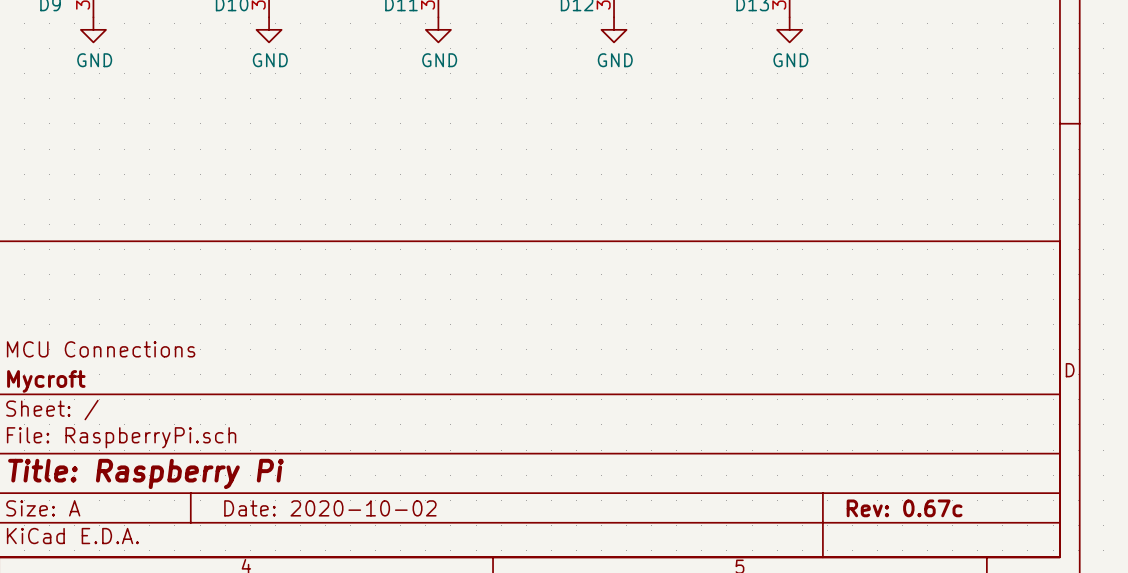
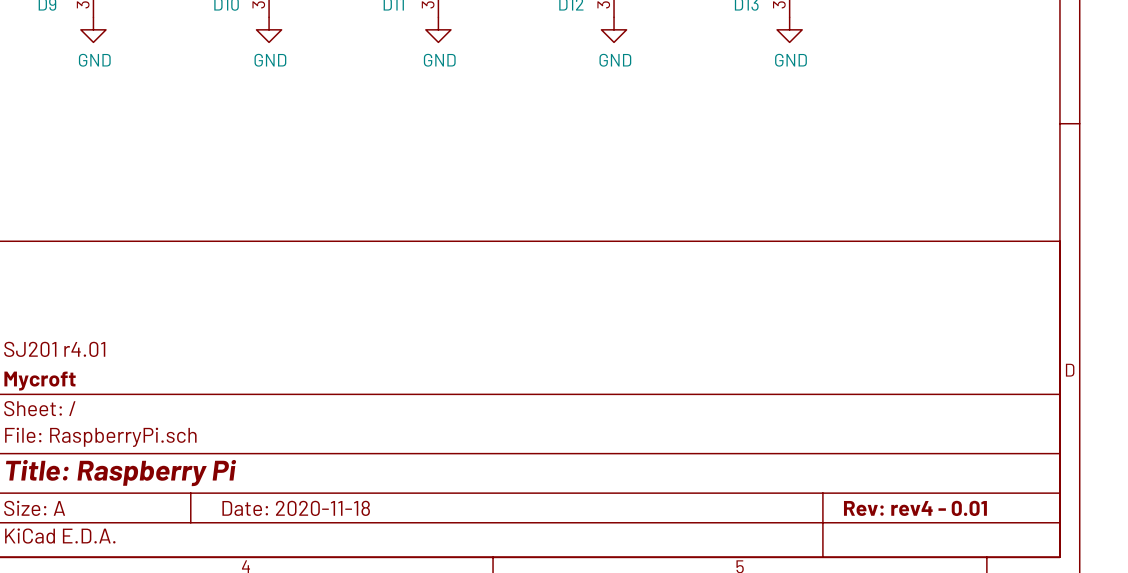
title block: MCU Connections (101, 349) -> SJ201 r4.01 (54, 349)
title block: Date: 2020-10-02 (330, 508) -> Date: 2020-11-18 (296, 508)
title block: Rev: 0.67c (904, 508) -> Rev: rev4 - 0.01 (915, 508)

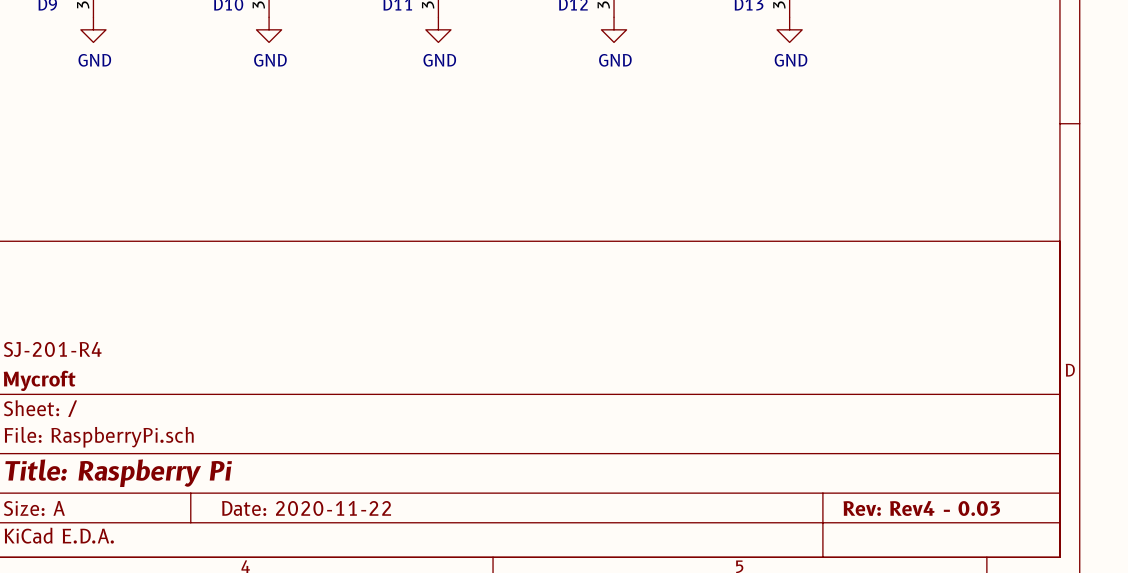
title block: SJ201 r4.01 (54, 349) -> SJ-201-R4 (52, 349)
title block: Date: 2020-11-18 (296, 508) -> Date: 2020-11-22 (306, 508)
title block: Rev: rev4 - 0.01 (915, 508) -> Rev: Rev4 - 0.03 (921, 508)

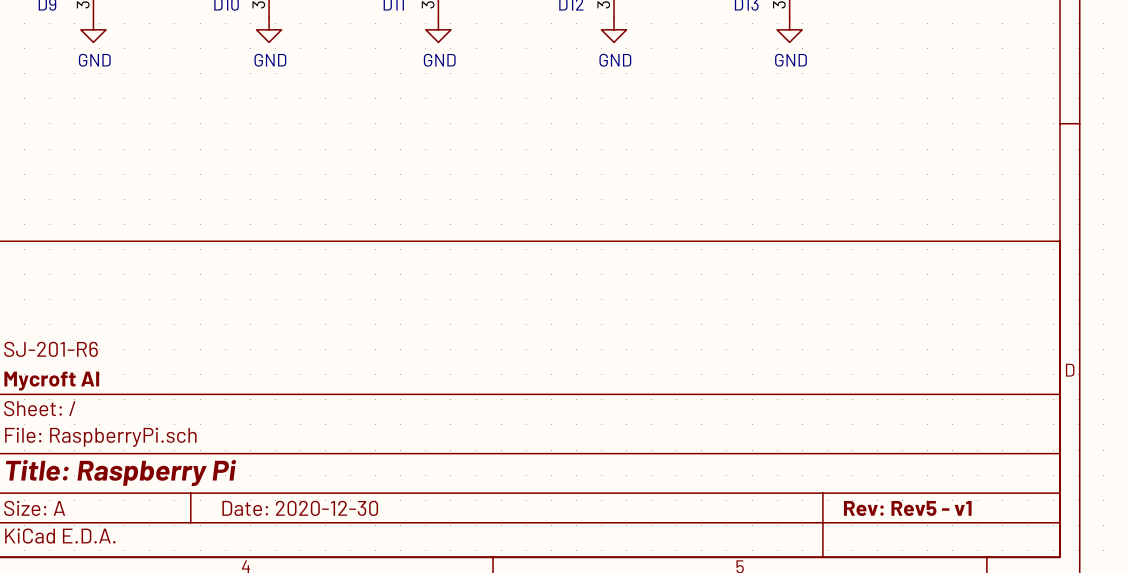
title block: SJ-201-R4 (52, 349) -> SJ-201-R6 (51, 349)
title block: Mycroft (39, 380) -> Mycroft AI (51, 381)
title block: Date: 2020-11-22 (306, 508) -> Date: 2020-12-30 (300, 508)
title block: Rev: Rev4 - 0.03 (921, 508) -> Rev: Rev5 - v1 (907, 508)

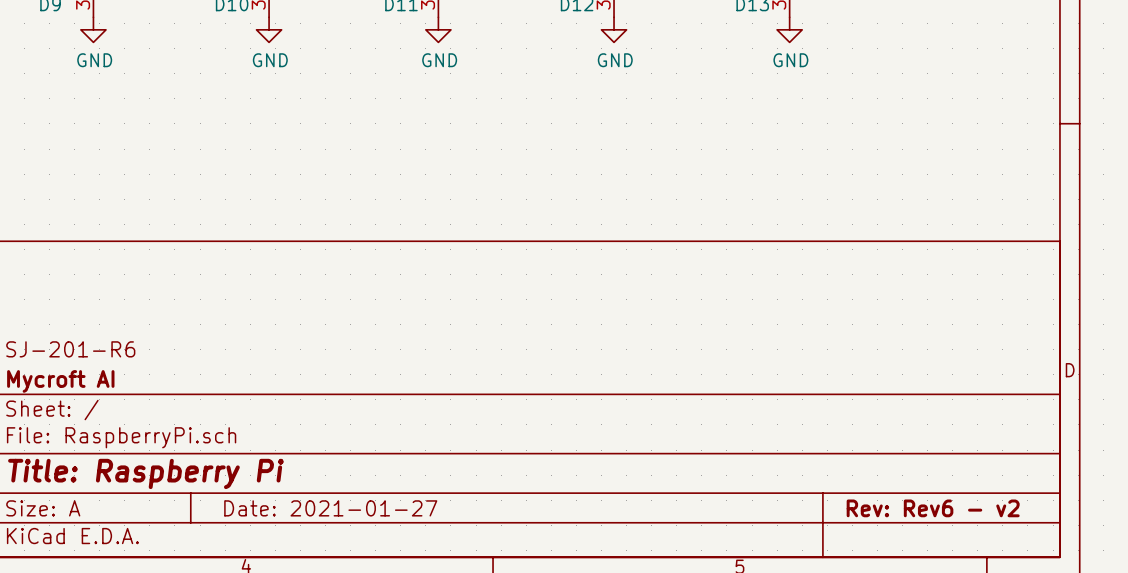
title block: Date: 2020-12-30 (300, 508) -> Date: 2021-01-27 (330, 508)
title block: Rev: Rev5 - v1 (907, 508) -> Rev: Rev6 - v2 (933, 508)

